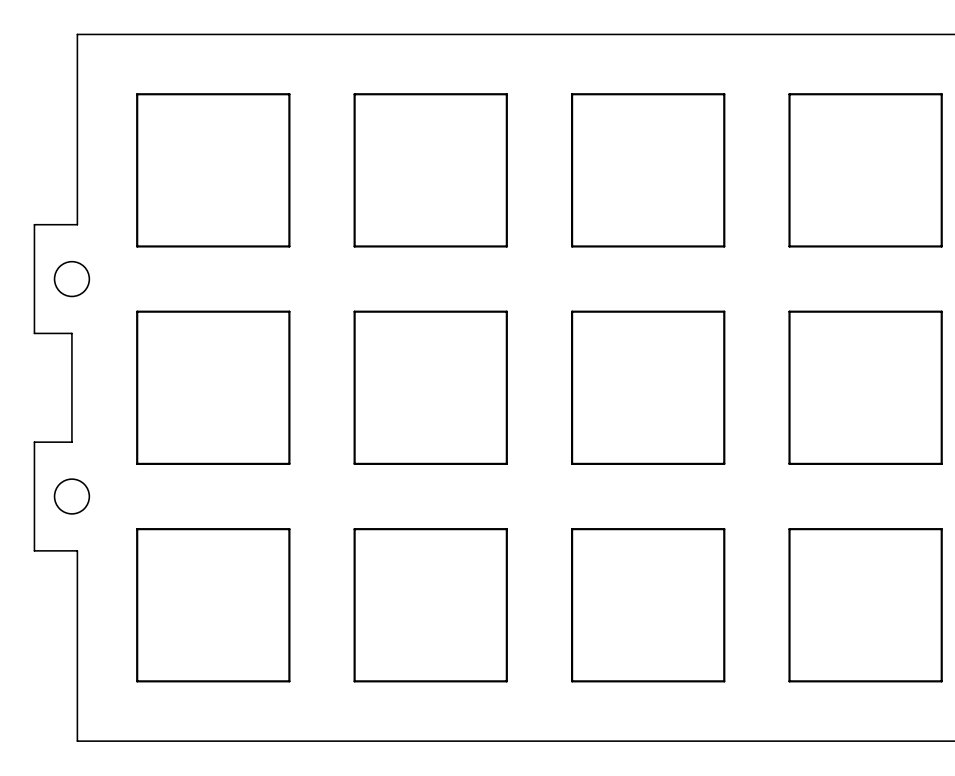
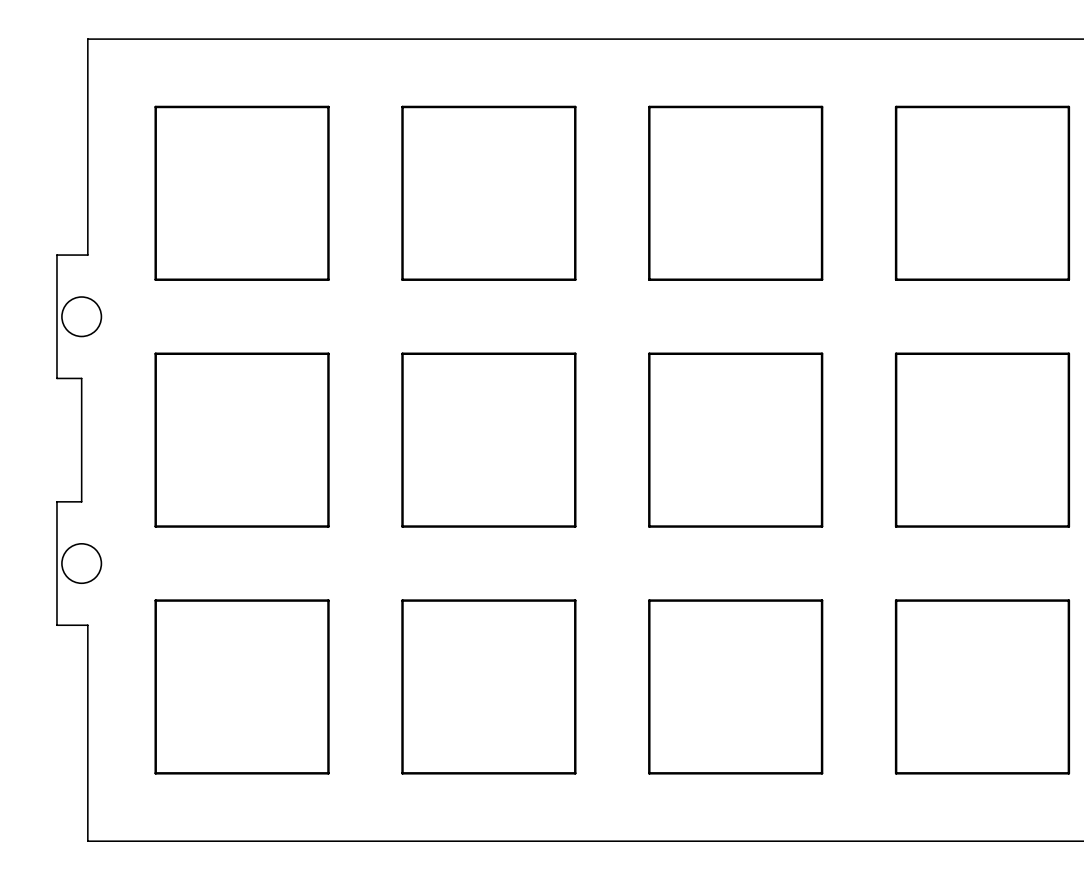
board edge: (50, 224) (34, 224) (34, 333) (50, 333) -> (56, 255) (56, 378)
board edge: (50, 442) (34, 442) (34, 550) (50, 550) -> (56, 501) (56, 625)

